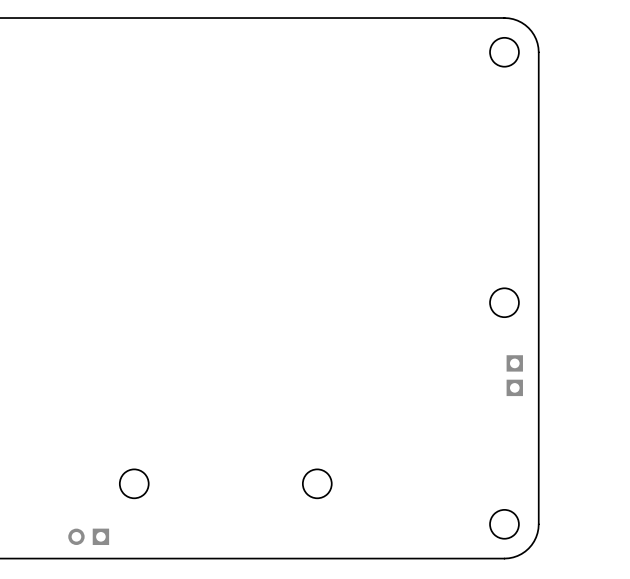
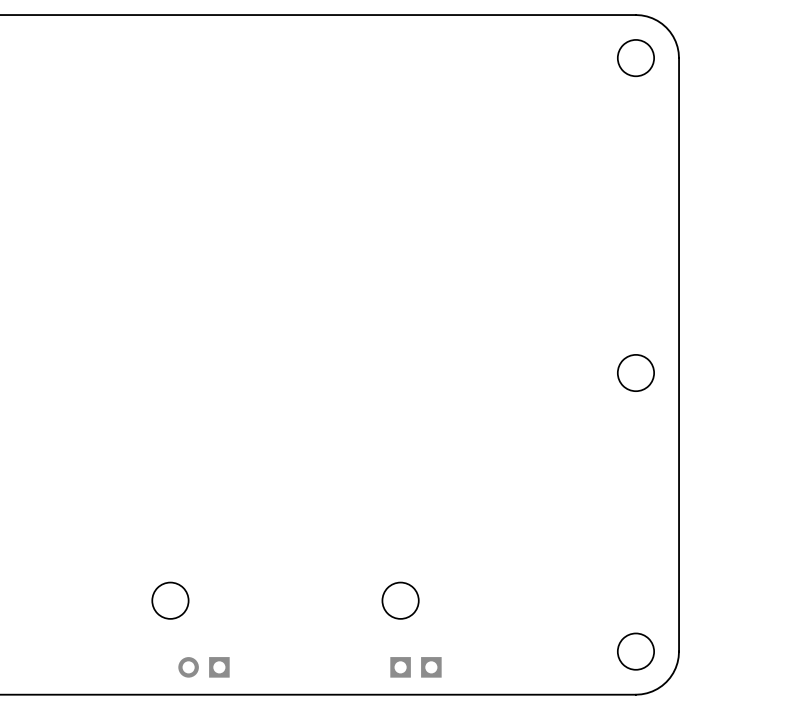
part: (514, 375) -> none
part position: (88, 536) -> (204, 667)
part: none -> (415, 667)

